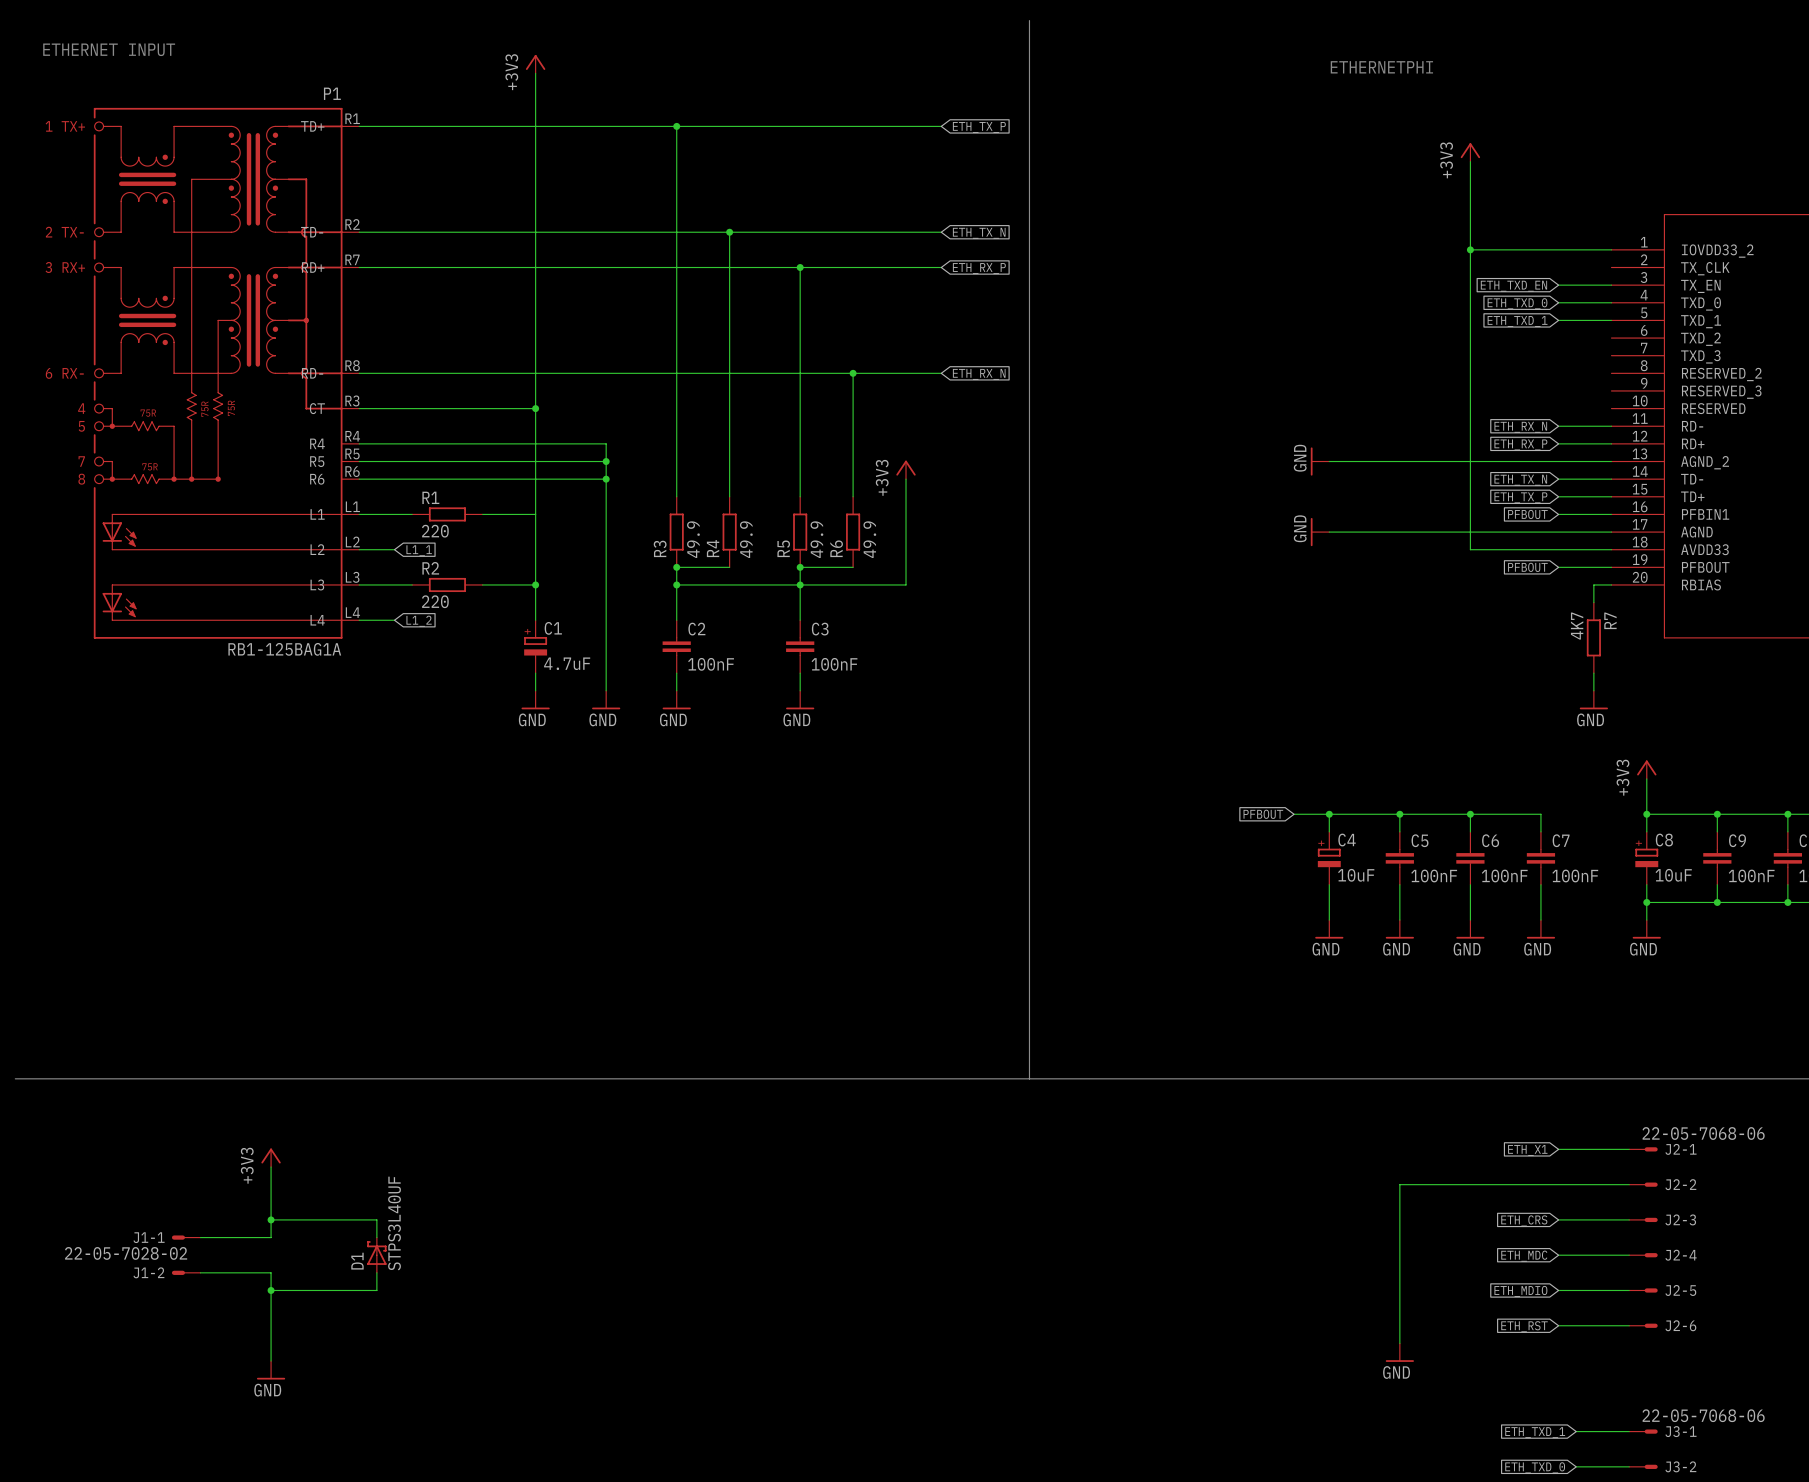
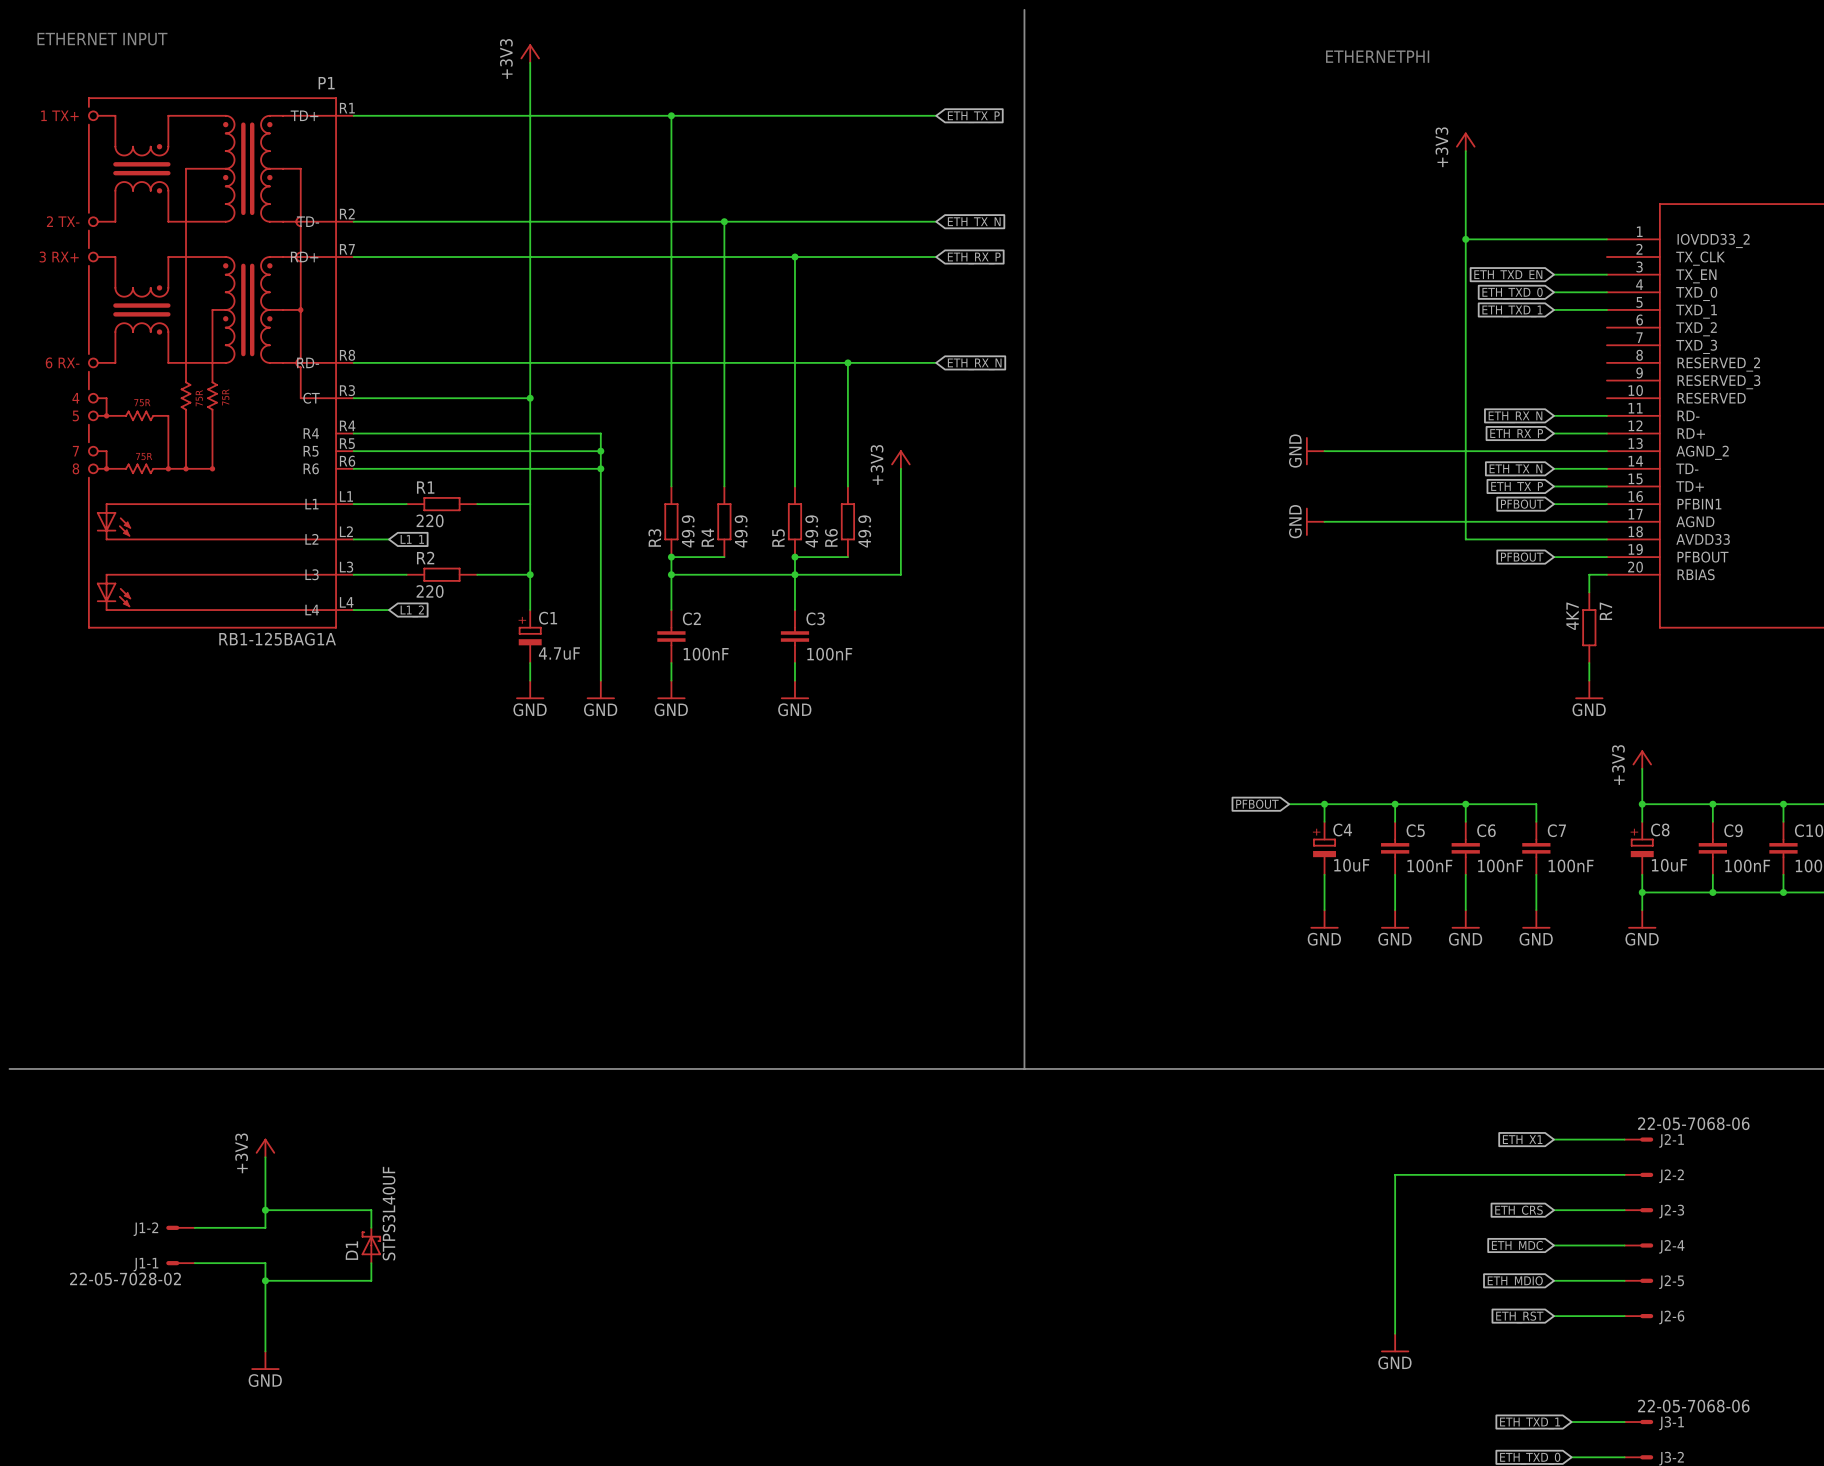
J1-1 name: J1-1 (149, 1237) -> J1-2 (145, 1229)
J1-1 value: 22-05-7028-02 (126, 1253) -> none
J1-2 name: J1-2 (148, 1272) -> J1-1 (145, 1264)
J1-2 value: none -> 22-05-7028-02 (125, 1279)

